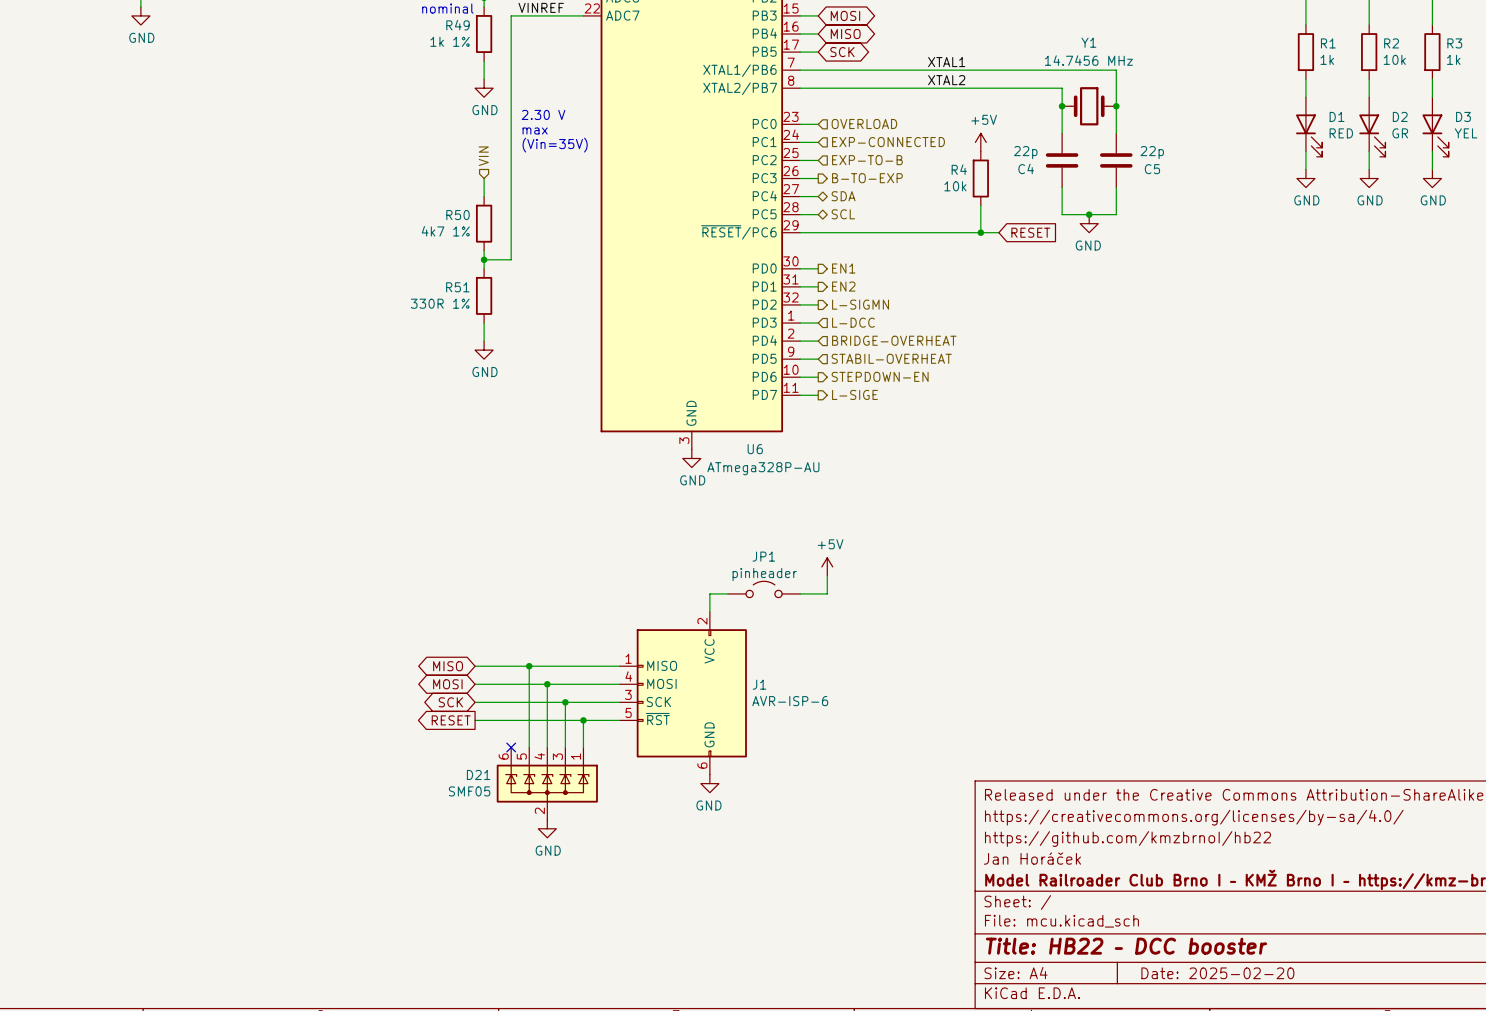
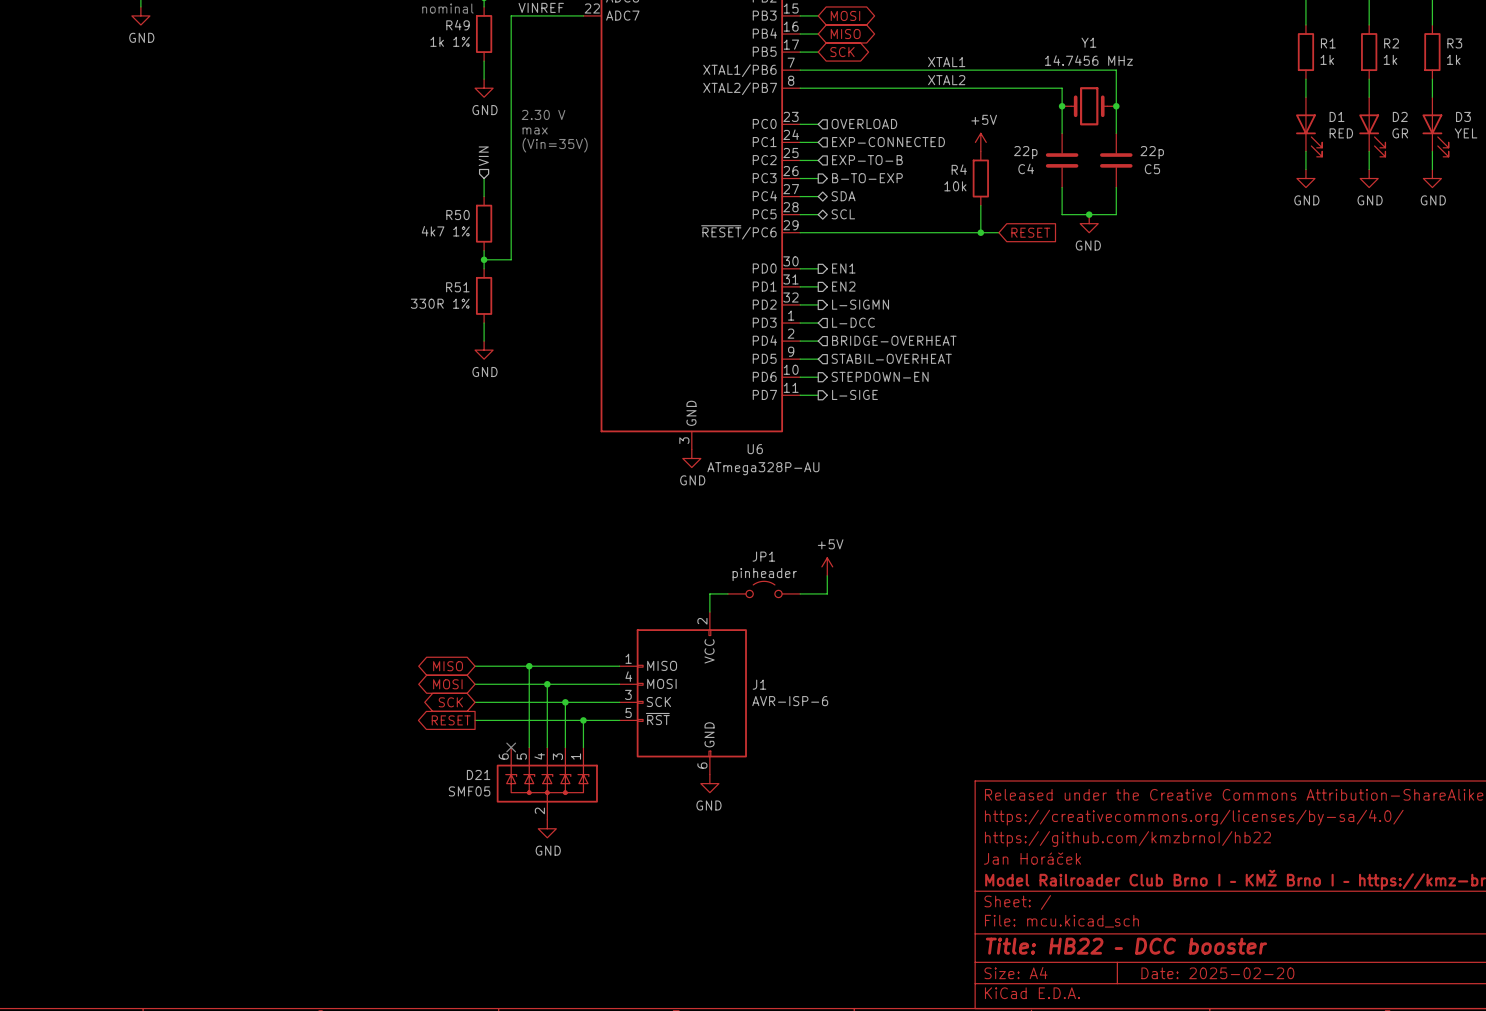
R2 value: 10k (1394, 59) -> 1k (1390, 59)

